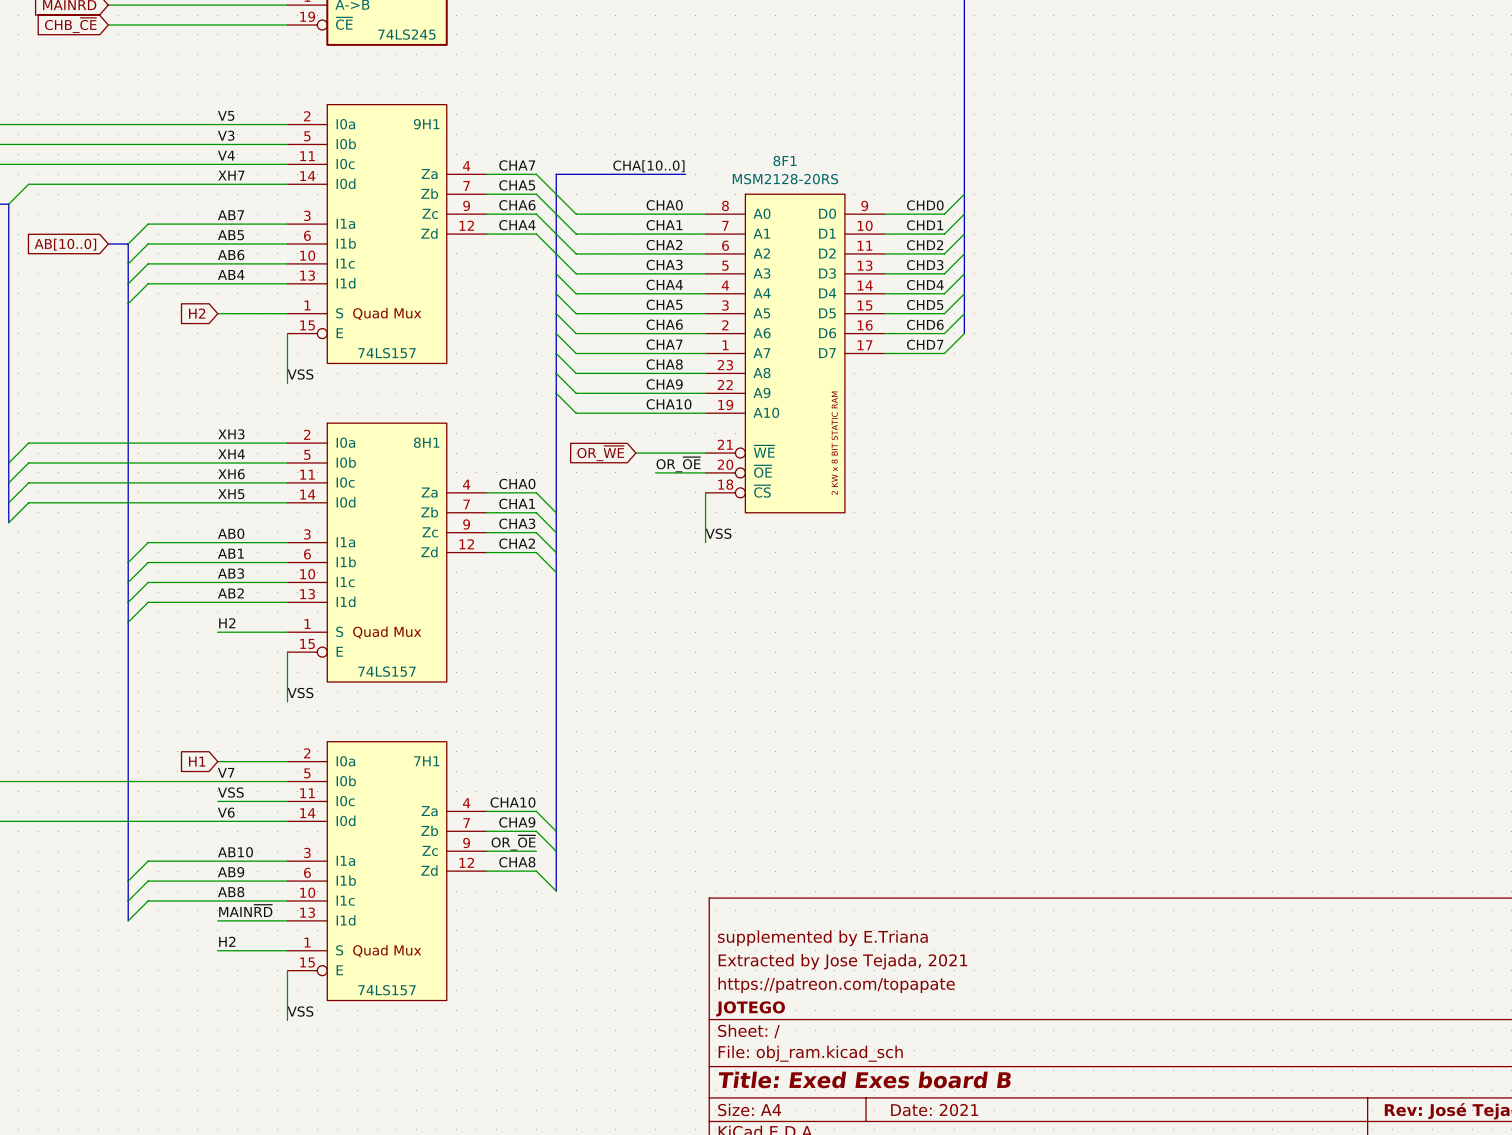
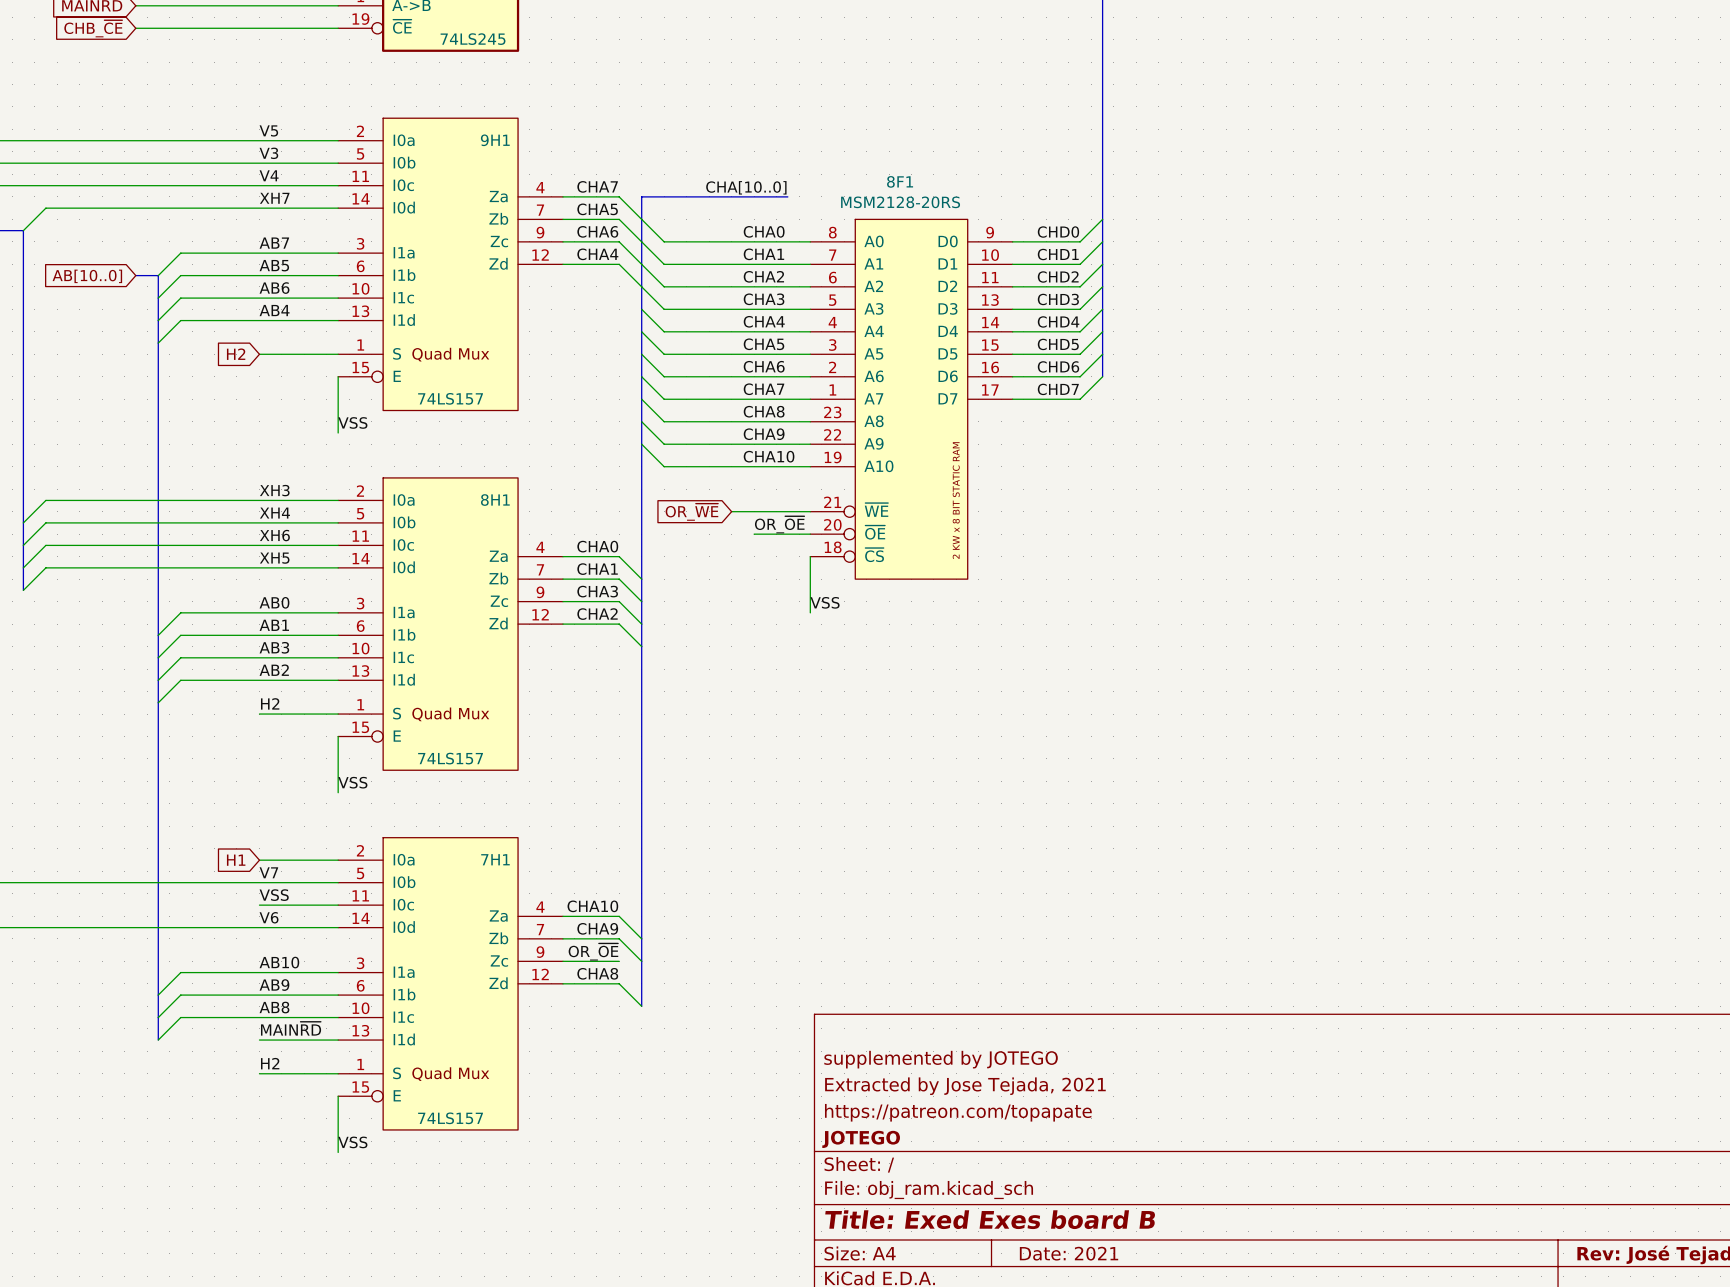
title block: supplemented by E.Triana (822, 938) -> supplemented by JOTEGO (941, 1059)

